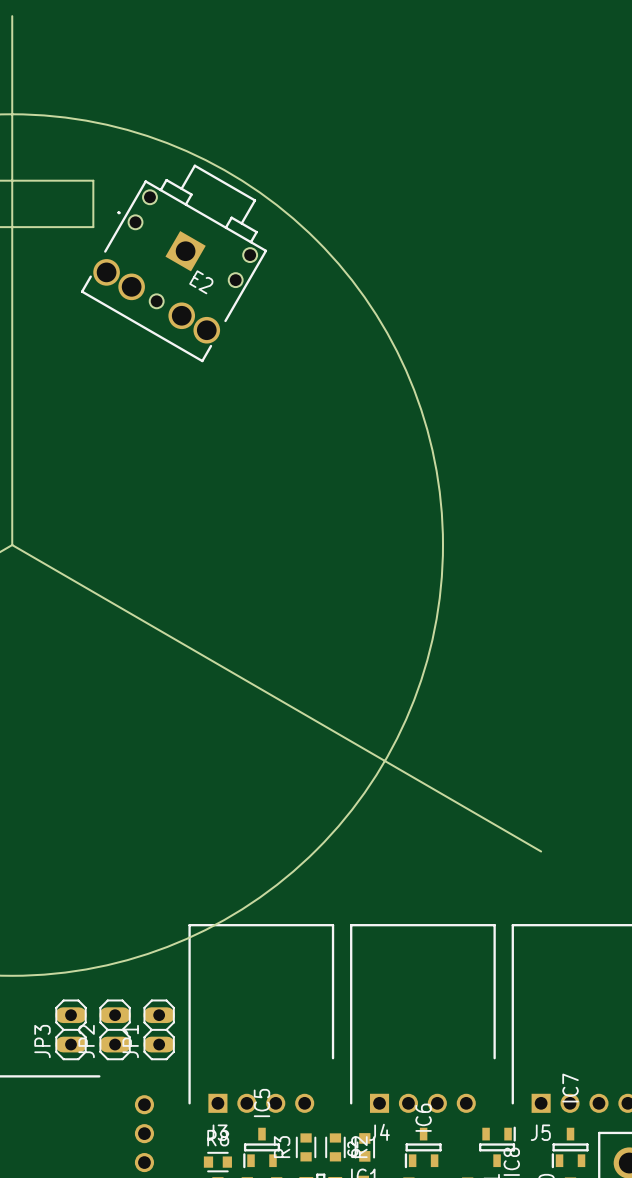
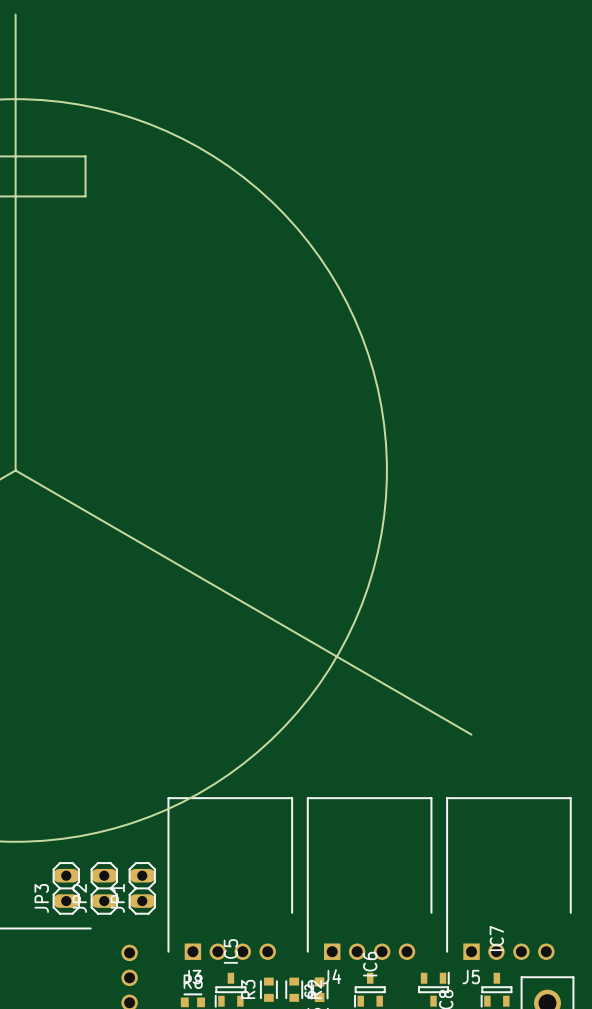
E2: (174, 263) -> none

